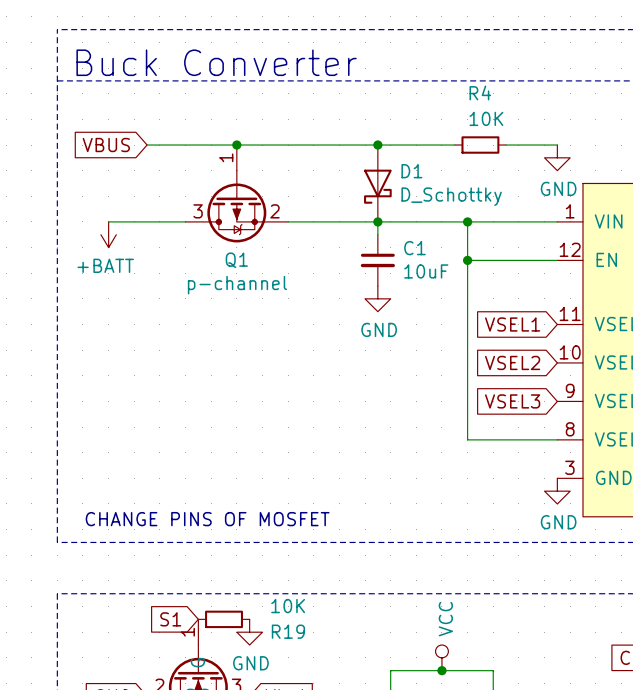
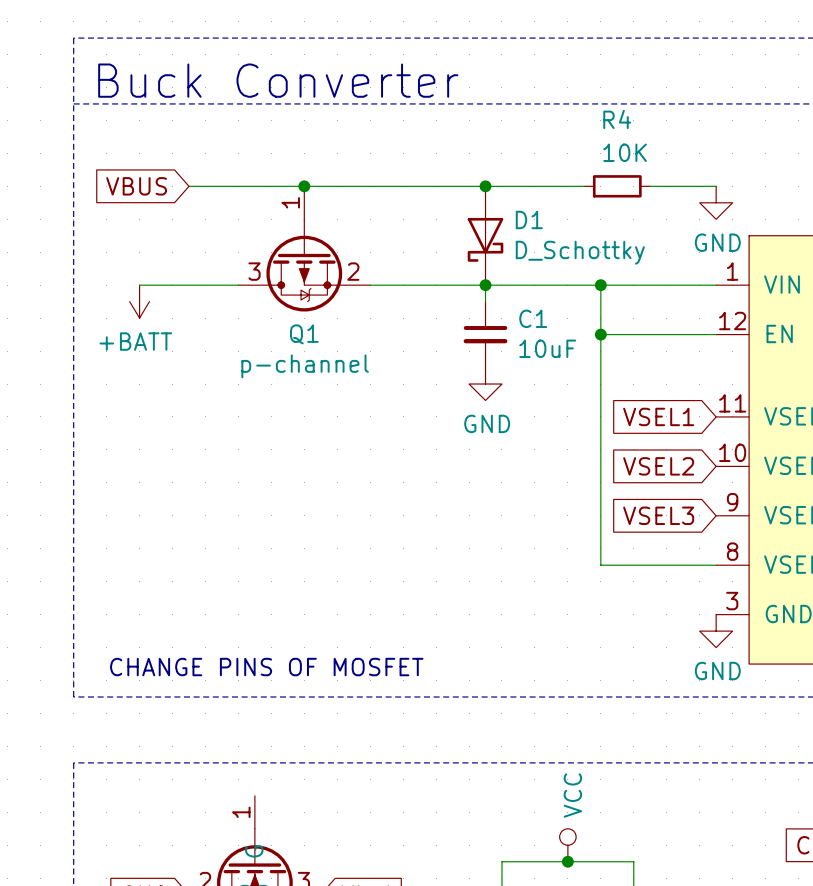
global label: S1 (170, 619) -> none
R19: 10K (224, 619) -> none
power symbol: GND (249, 632) -> none

